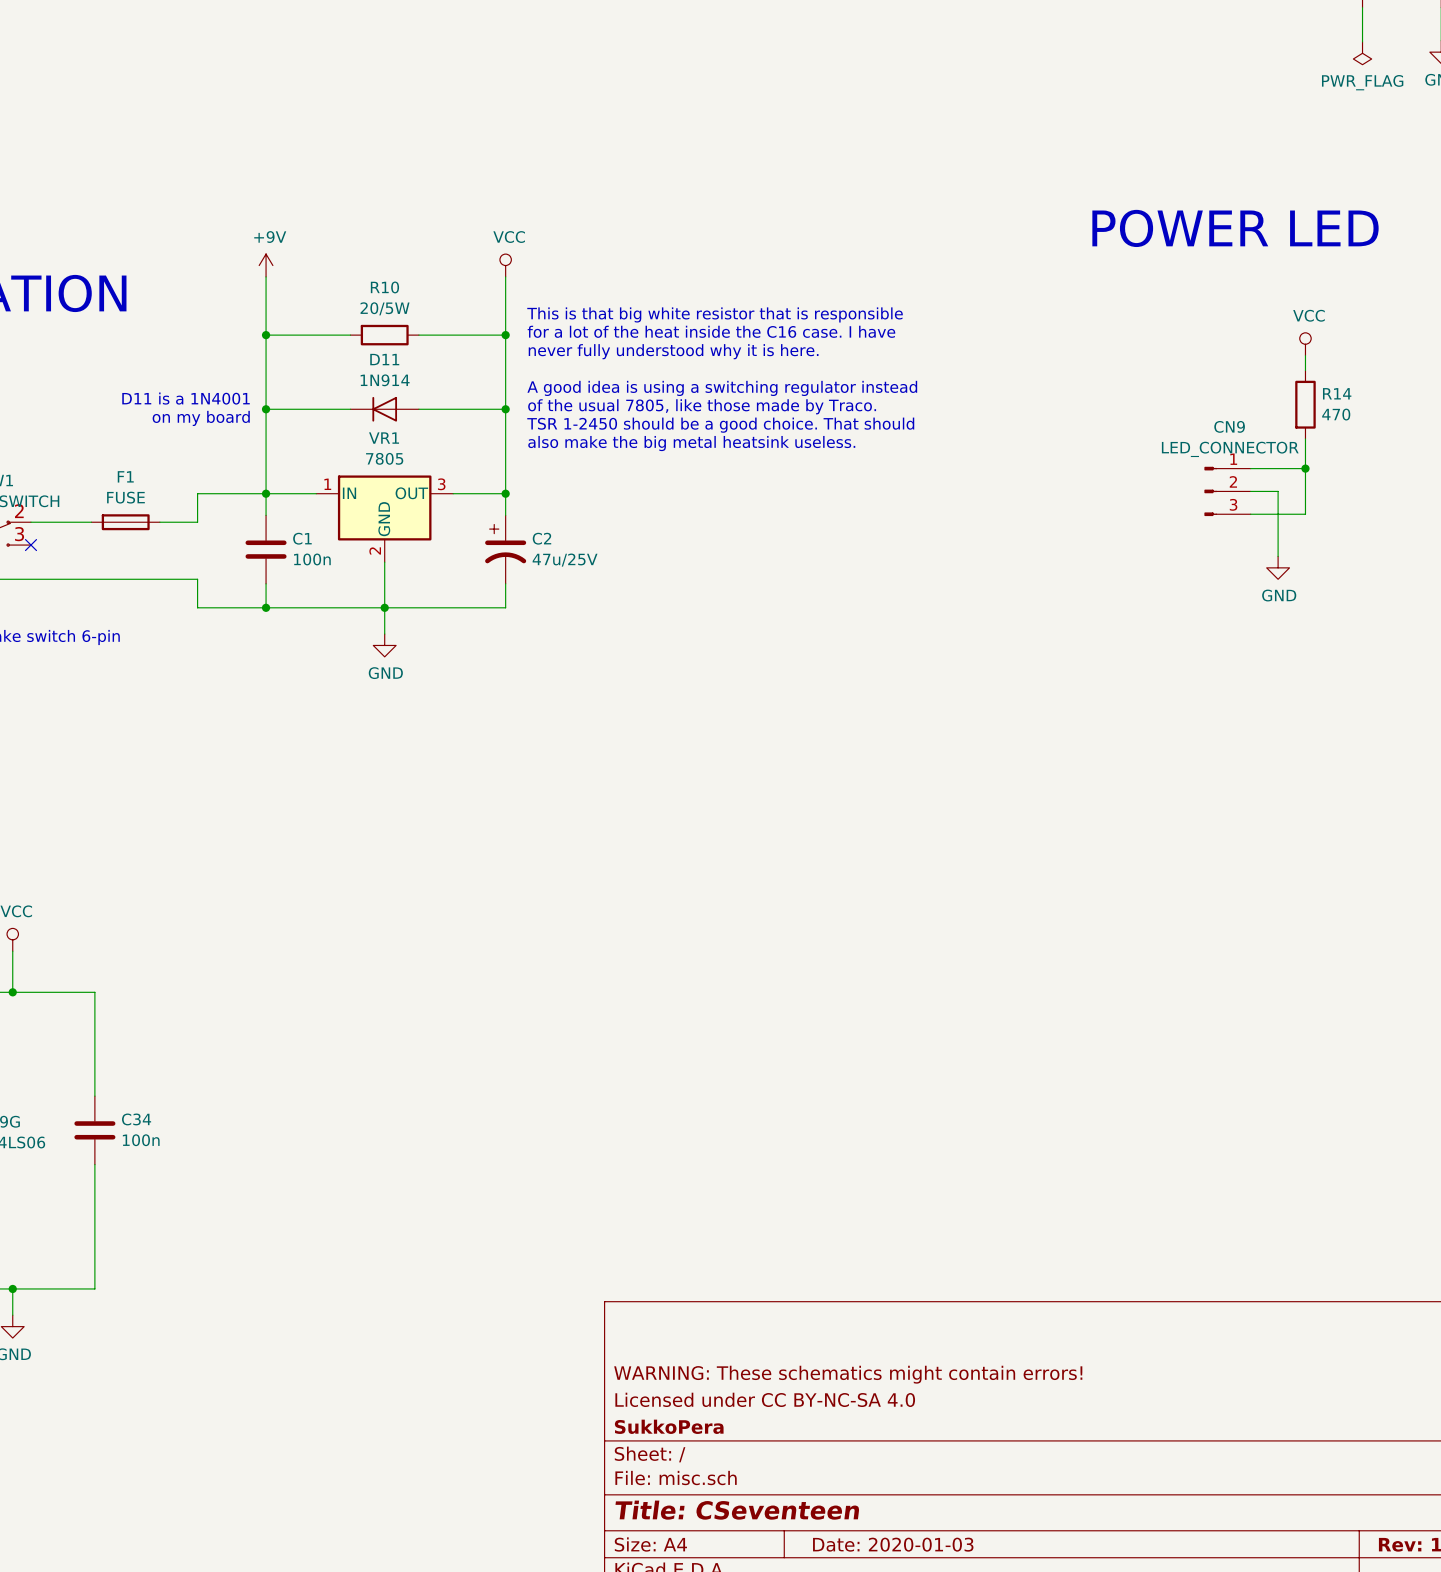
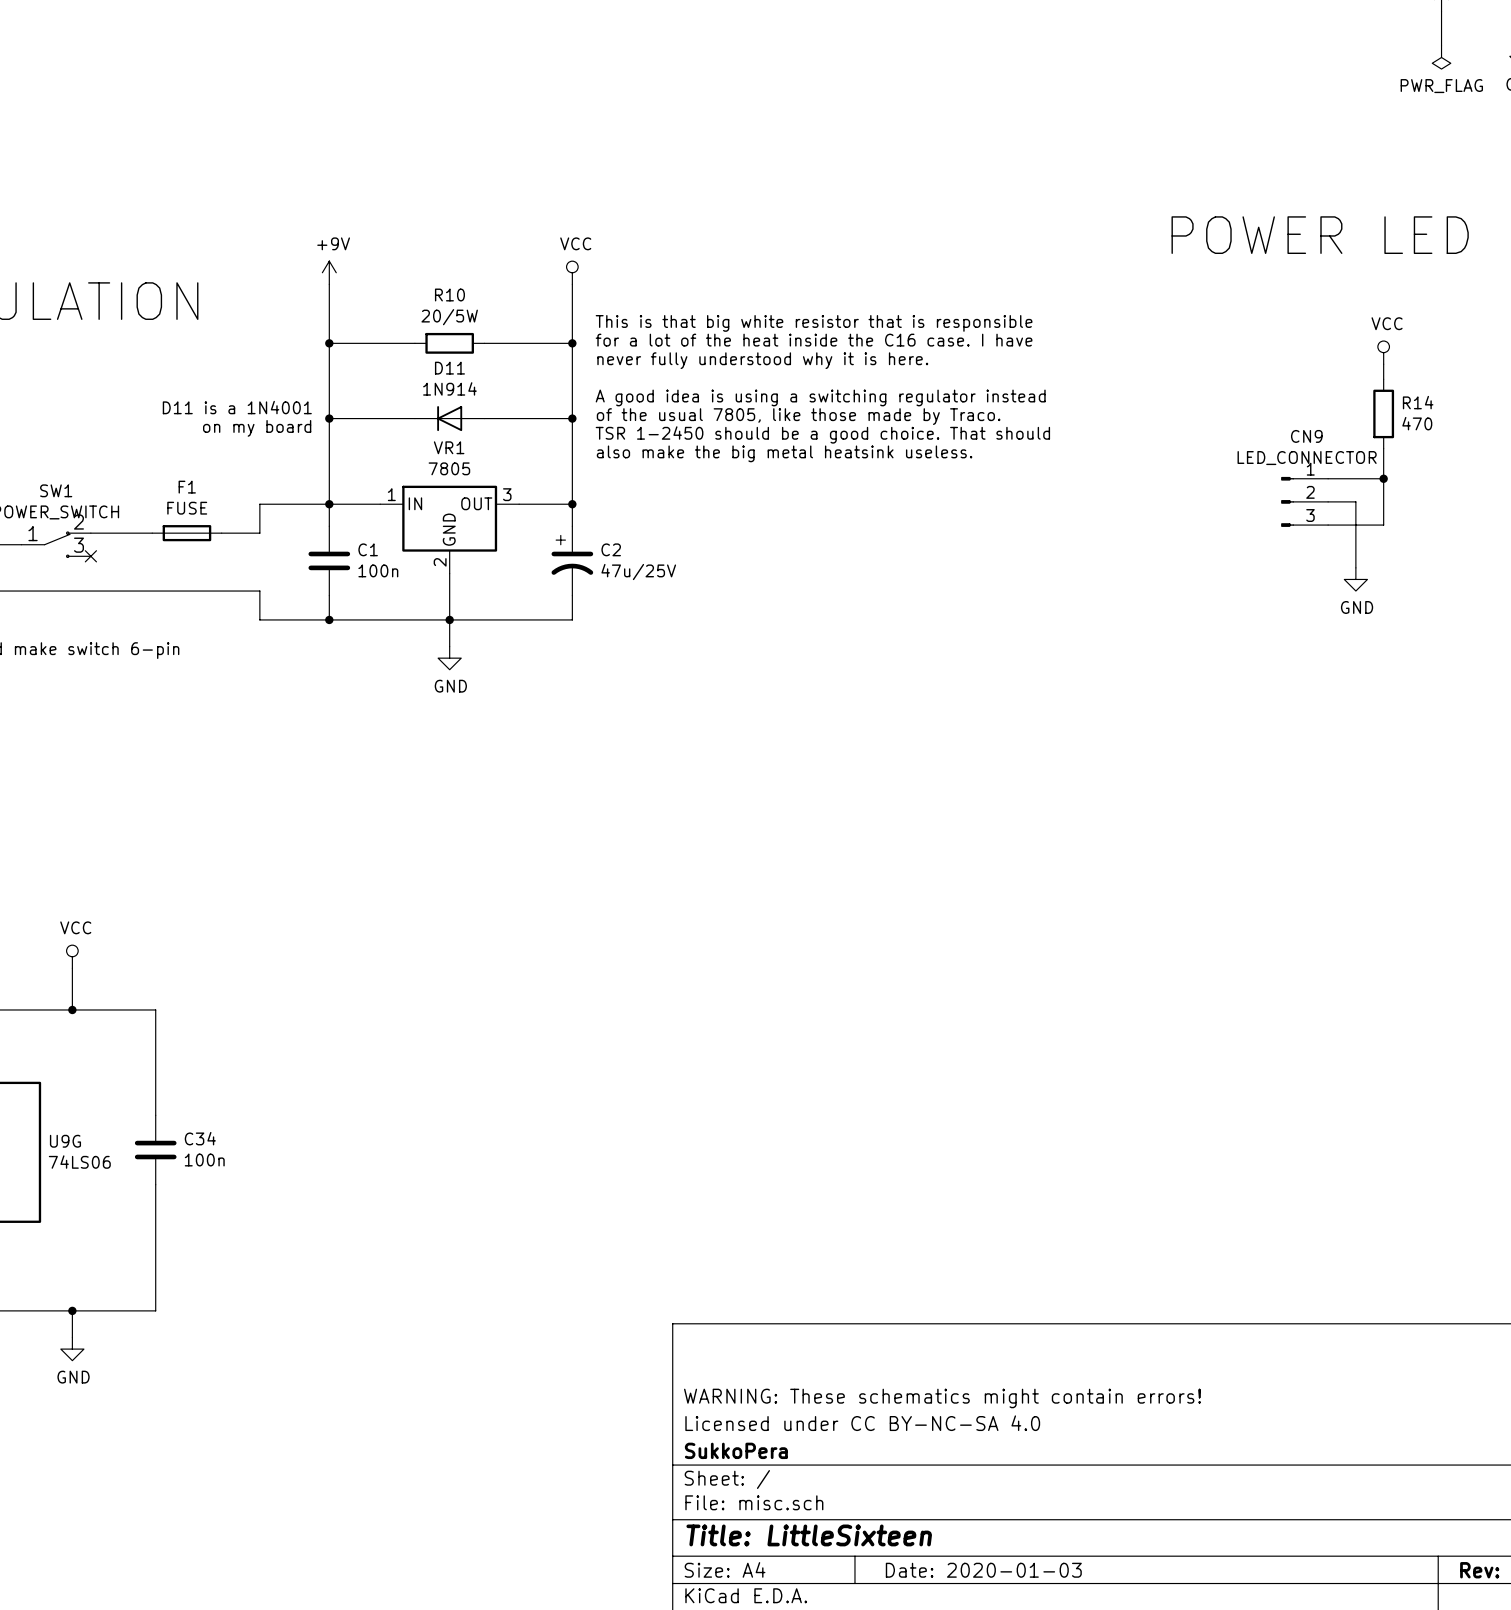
title block: Title: CSeventeen (737, 1510) -> Title: LittleSixteen (809, 1535)

